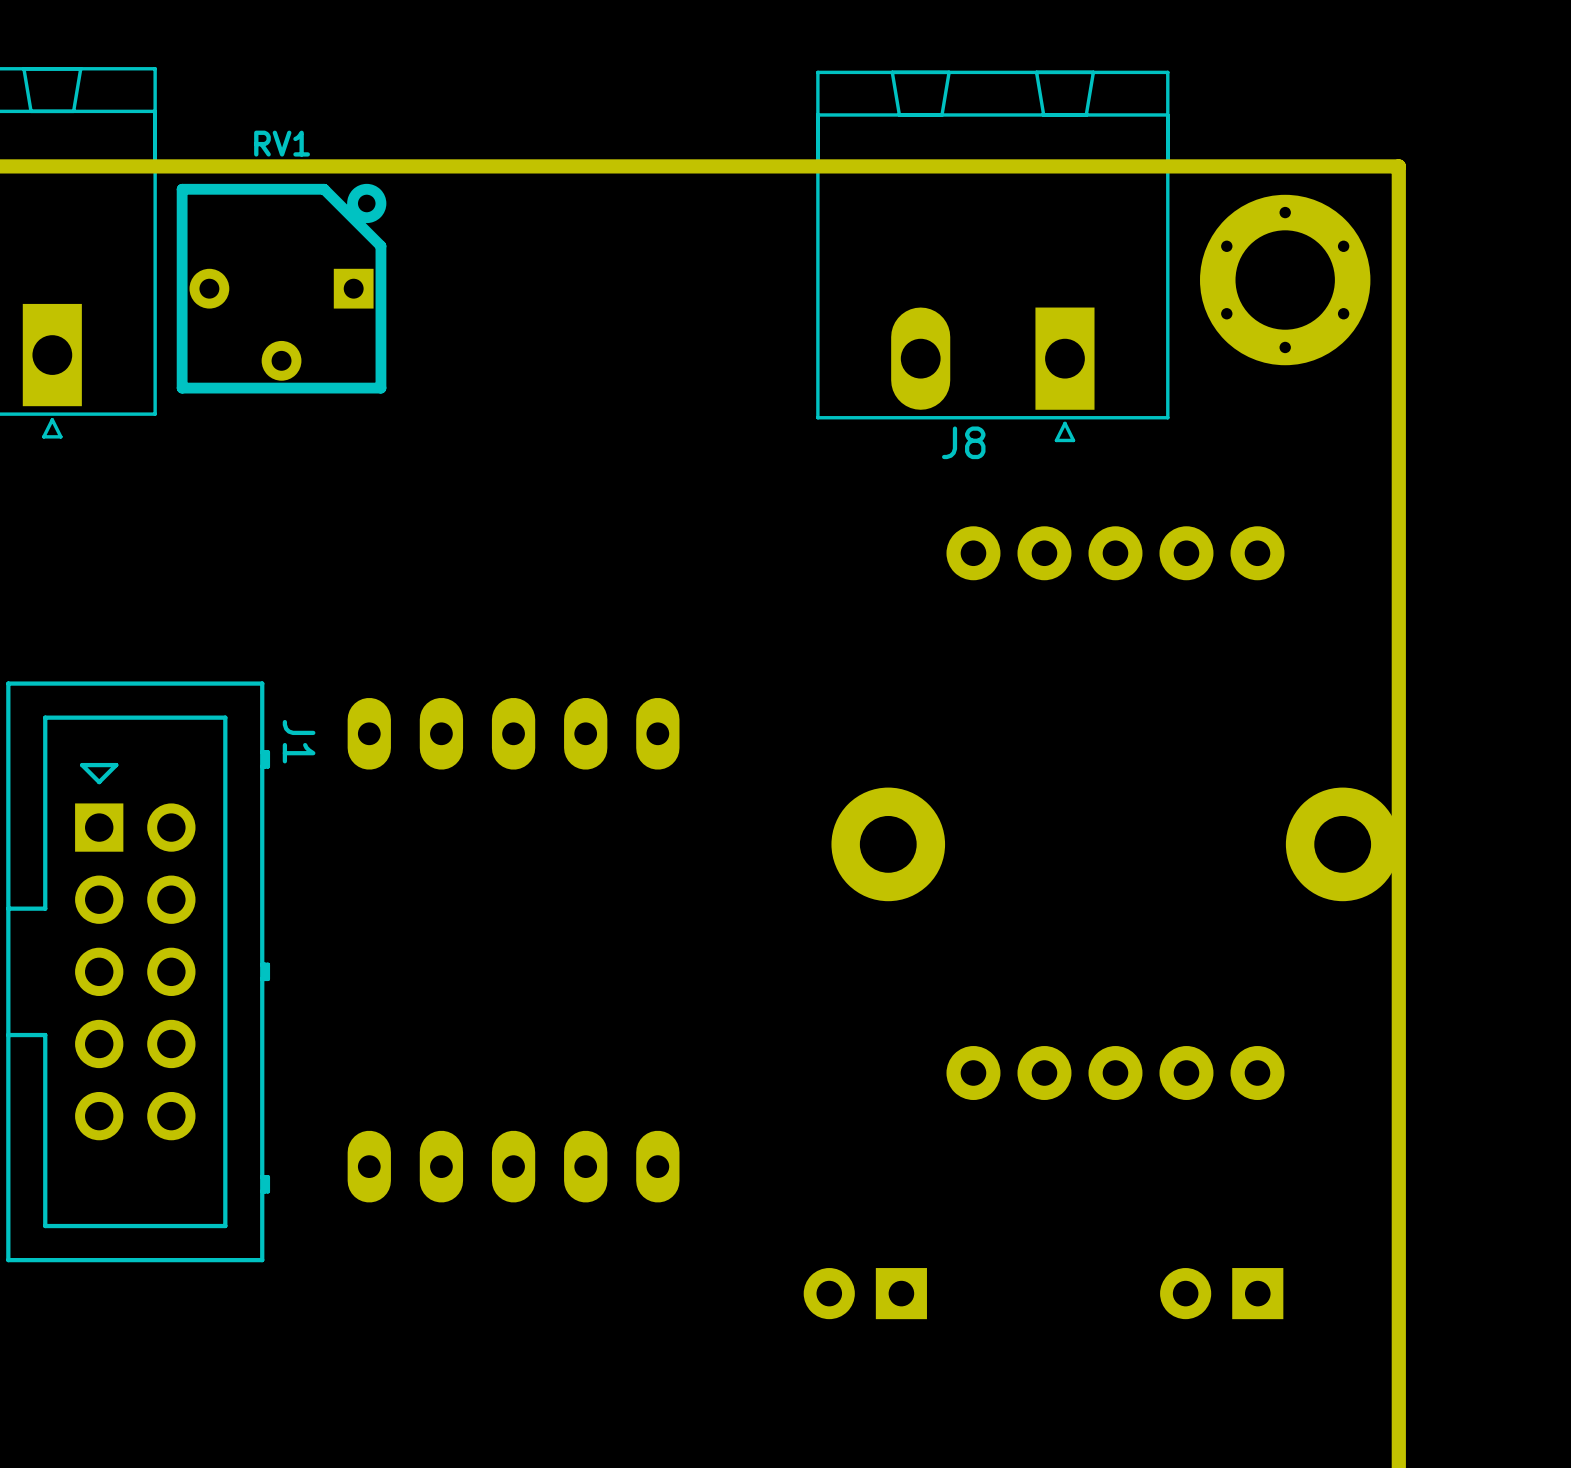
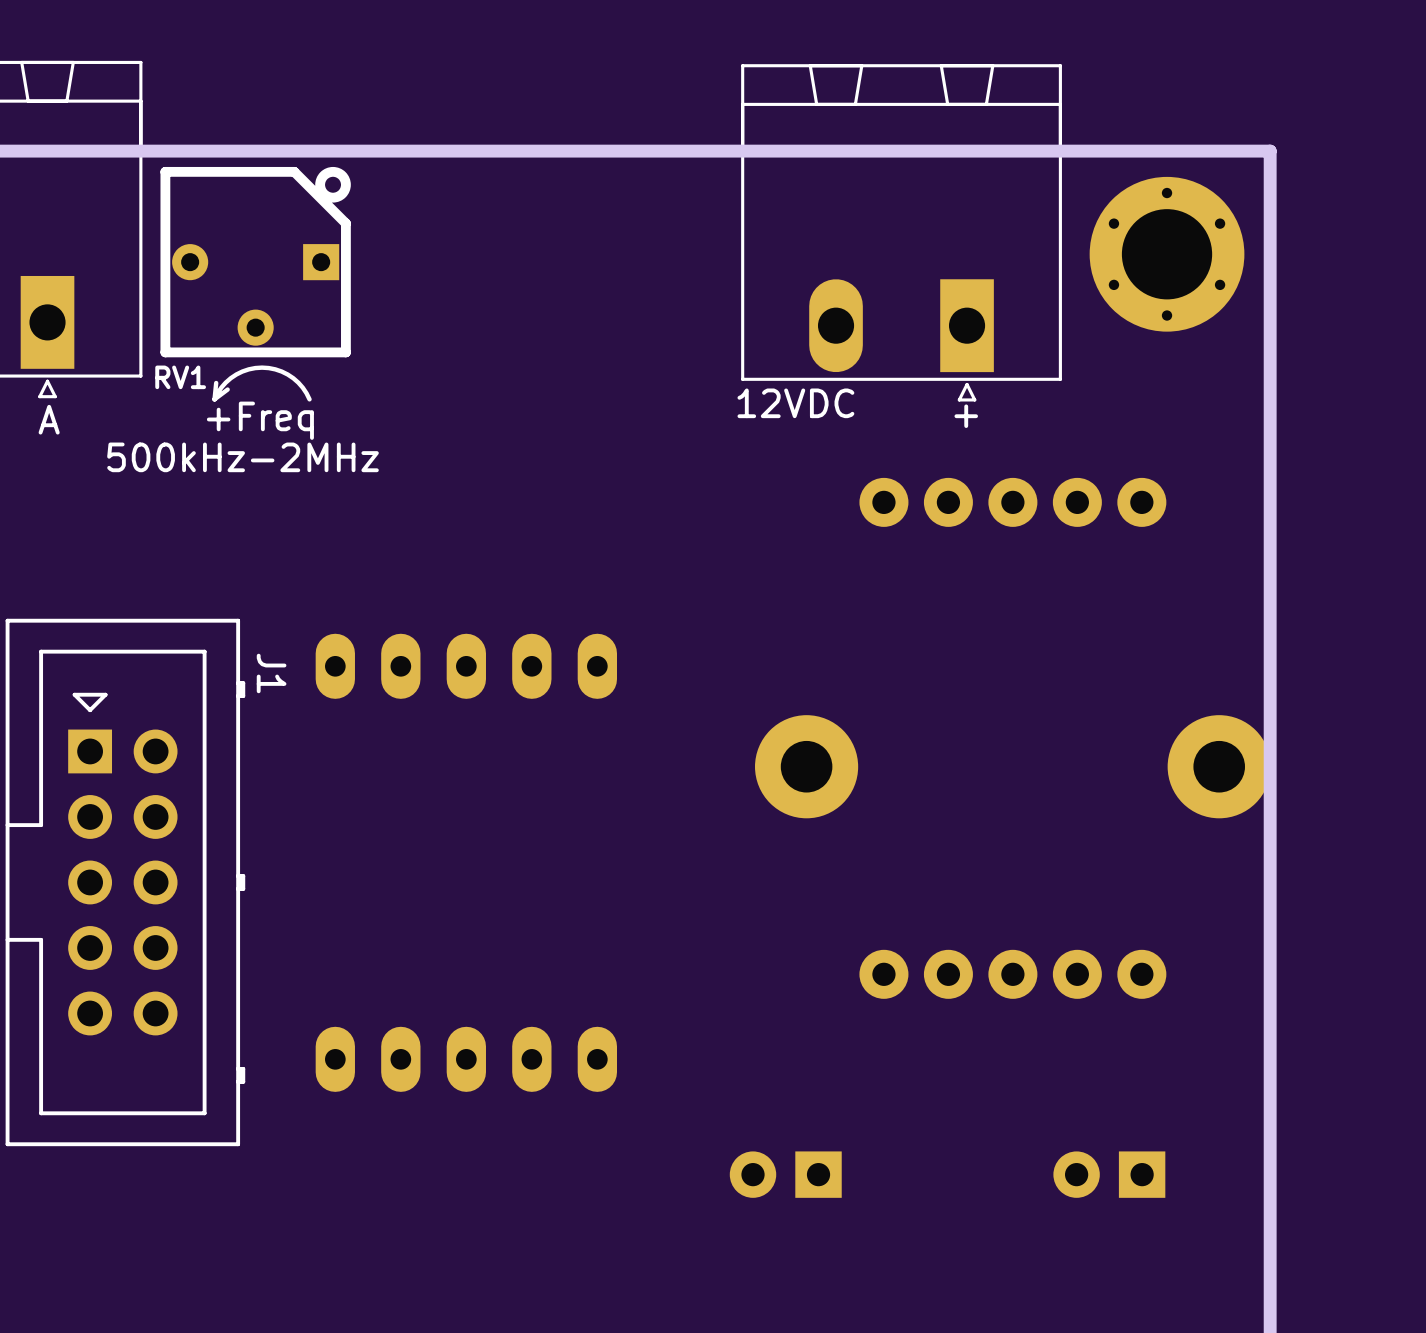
RV1 name position: RV1 (282, 143) -> RV1 (180, 377)
line: none -> (216, 382) (214, 399)
line: none -> (227, 389) (214, 399)
line: none -> (309, 399) (302, 387) (293, 378) (281, 371) (262, 367) (248, 369) (236, 374) (221, 387) (214, 399)
J8 name: J8 (963, 442) -> none
text: none -> 12VDC (795, 403)
text: none -> + (966, 416)
text: none -> A (49, 419)
text: none -> +Freq (260, 420)
text: none -> 500kHz-2MHz (243, 457)

